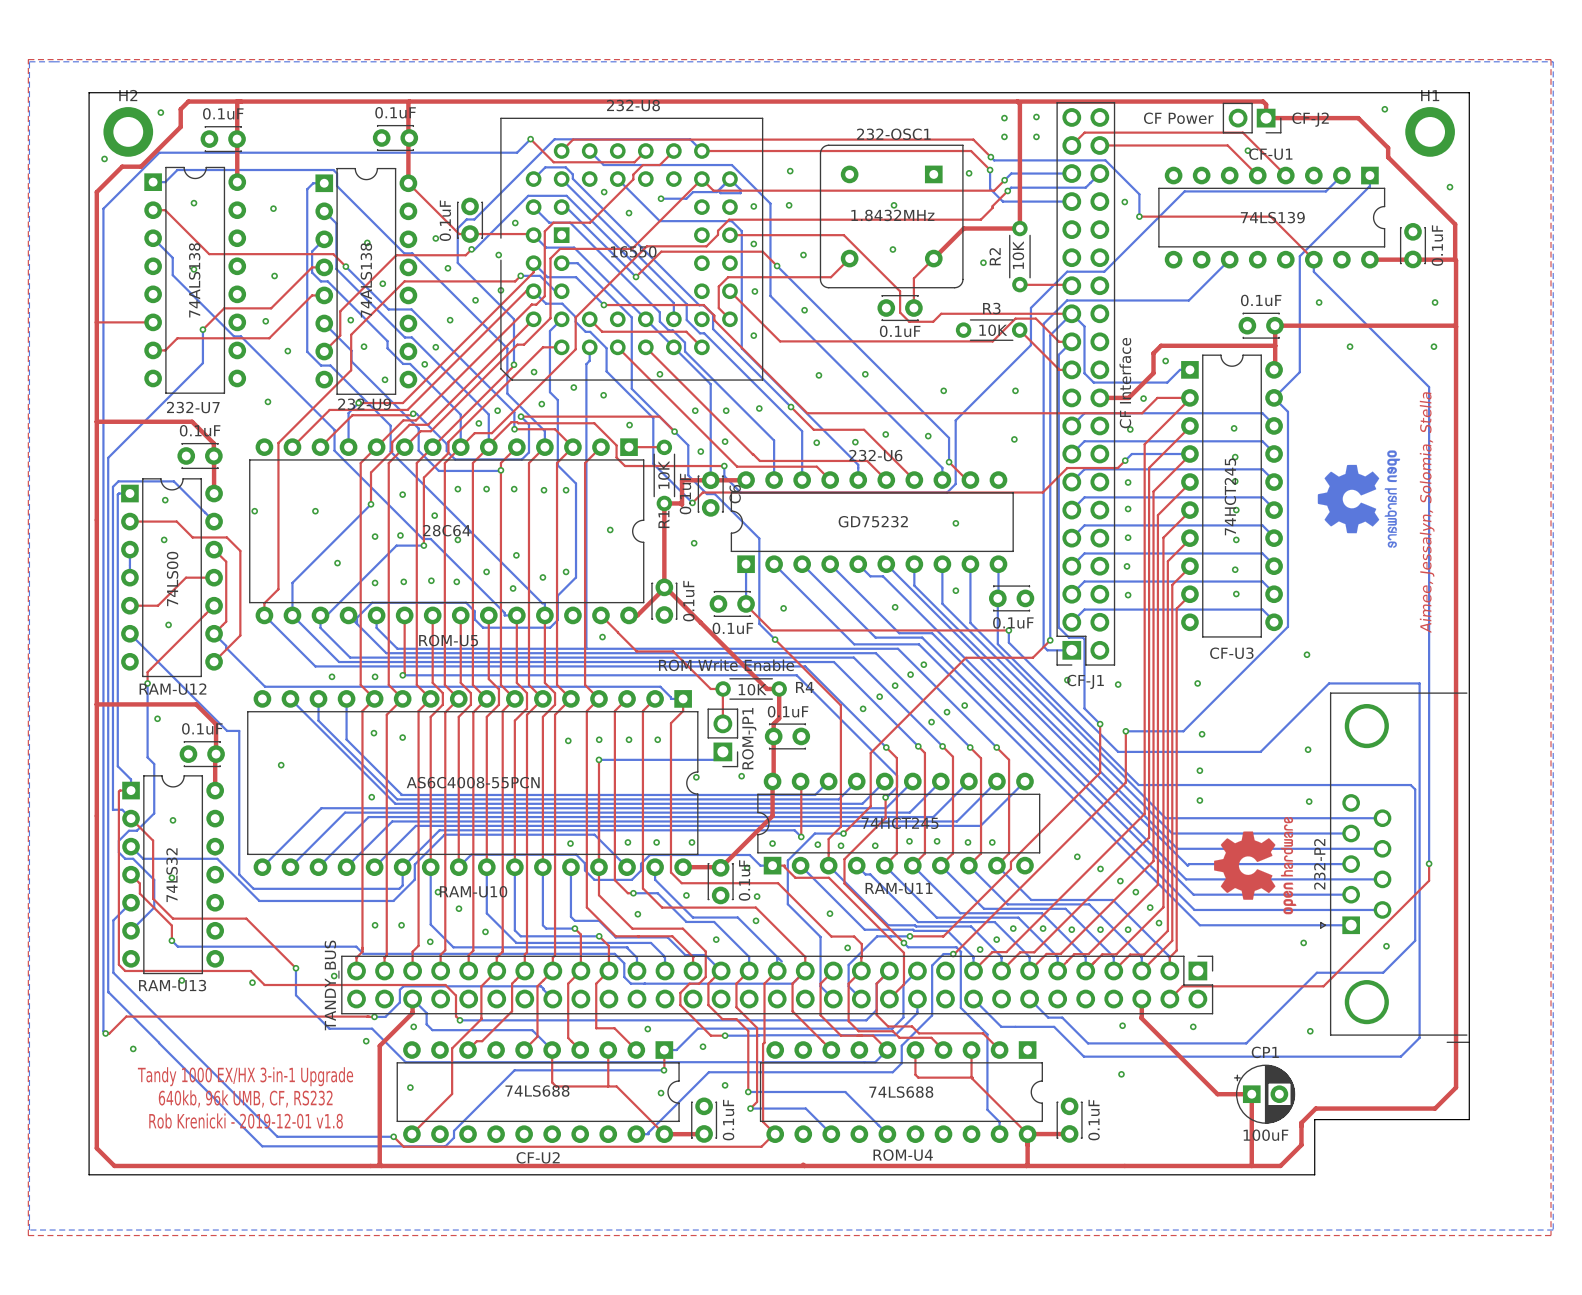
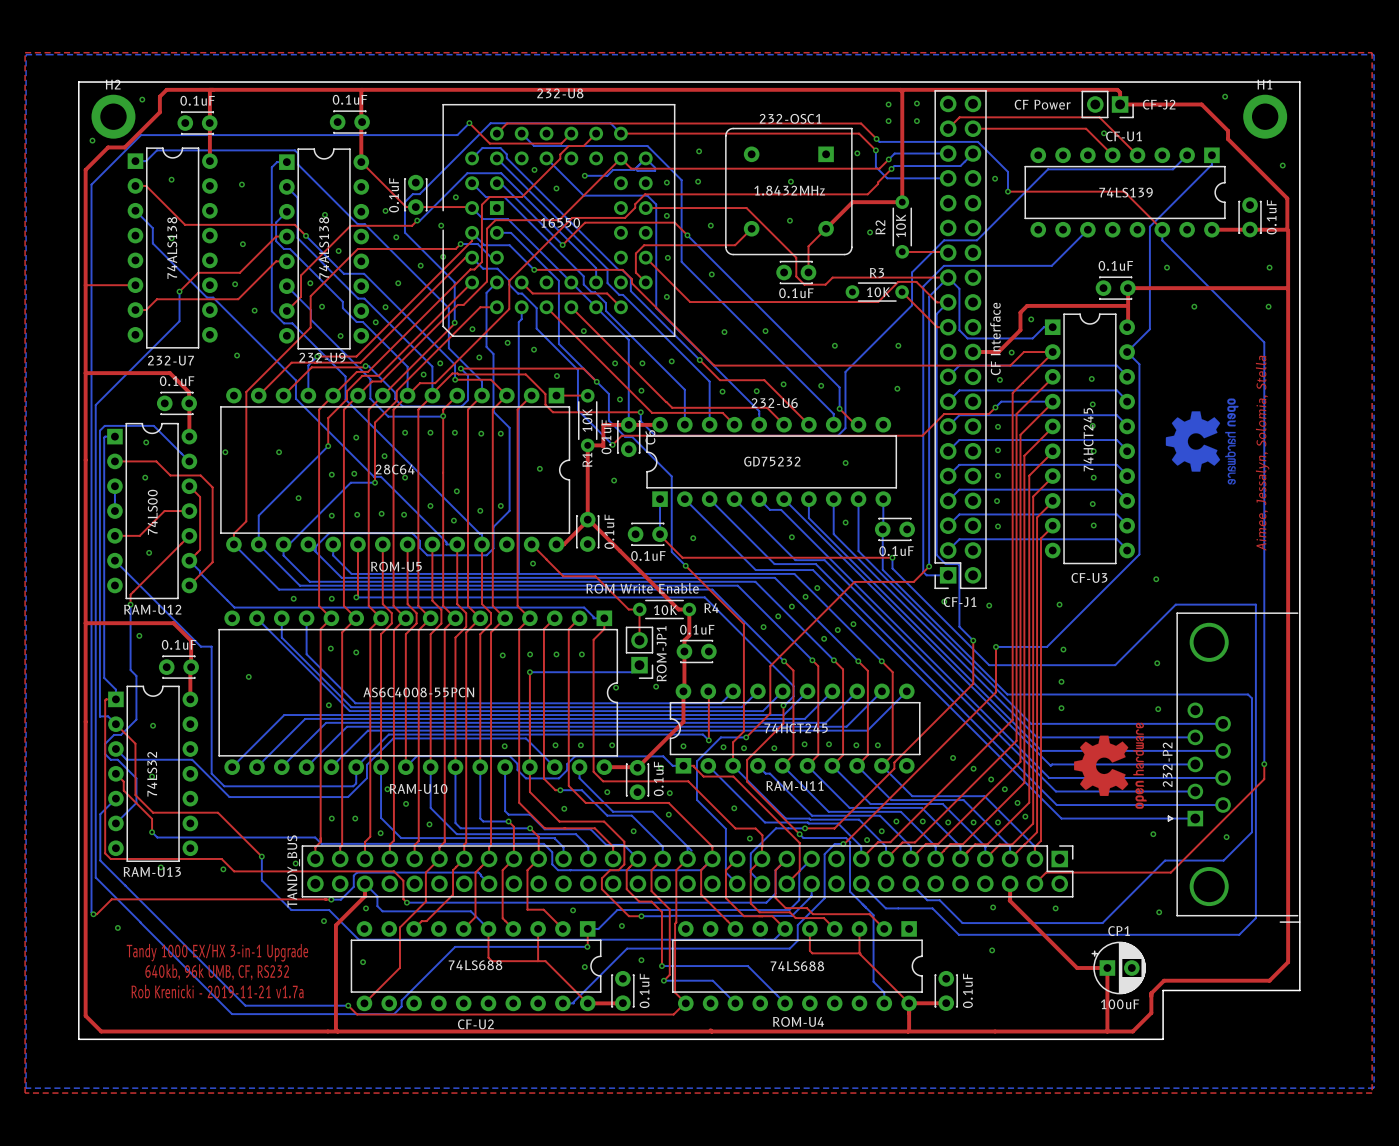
text: Rob Krenicki - 2019-12-01 v1.8 (246, 1121) -> Rob Krenicki - 2019-11-21 v1.7a (217, 991)

